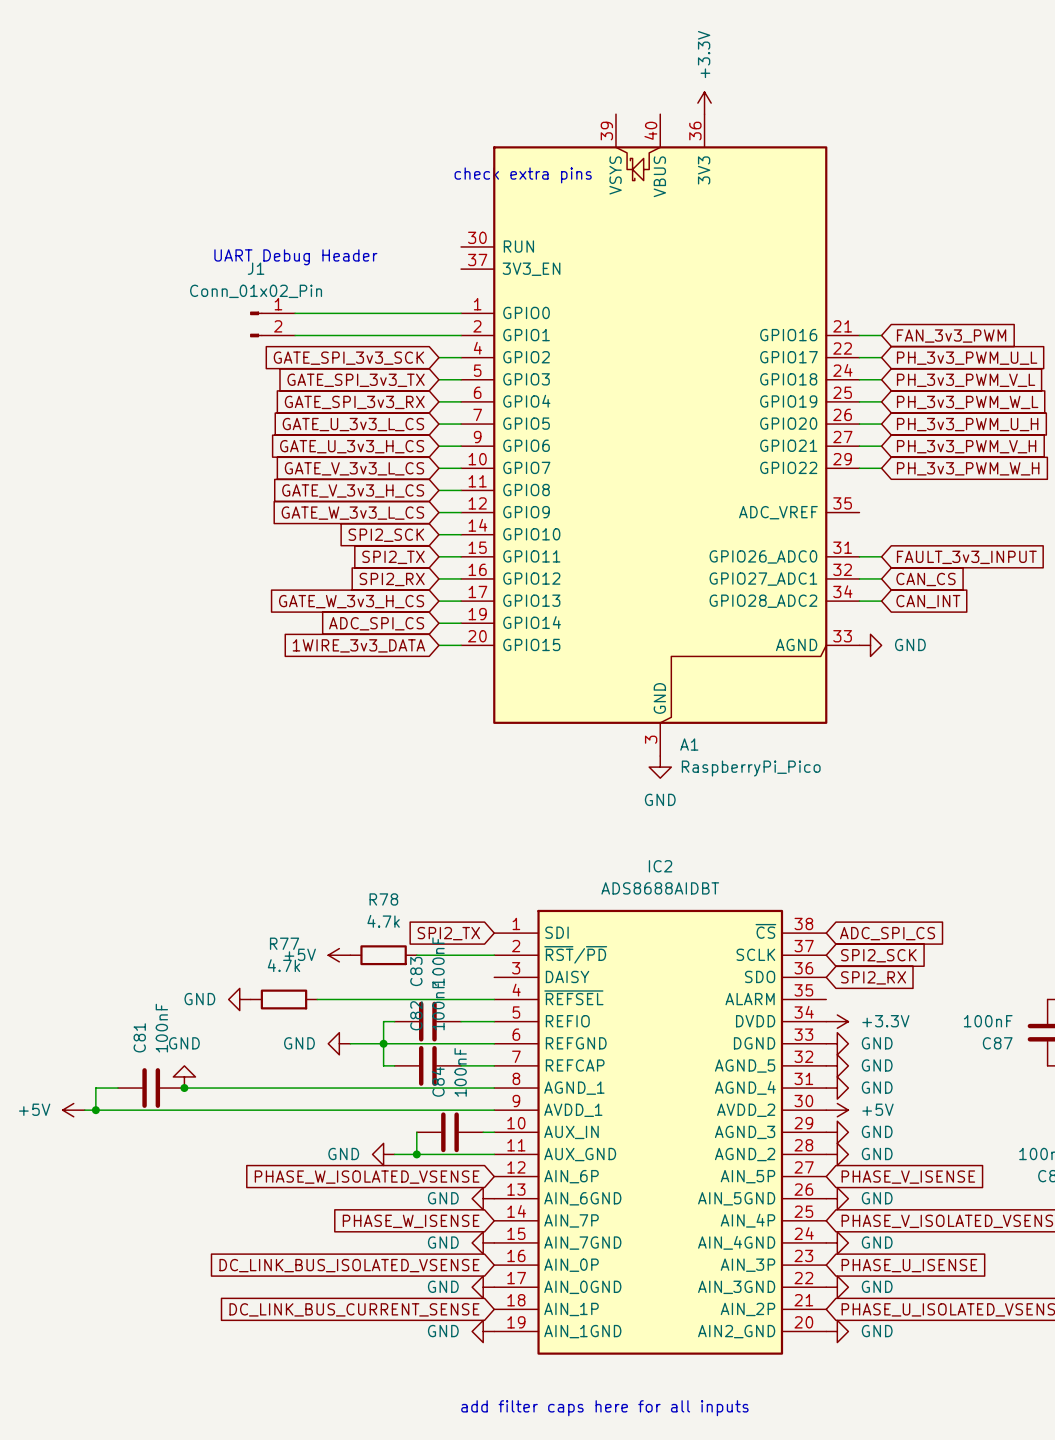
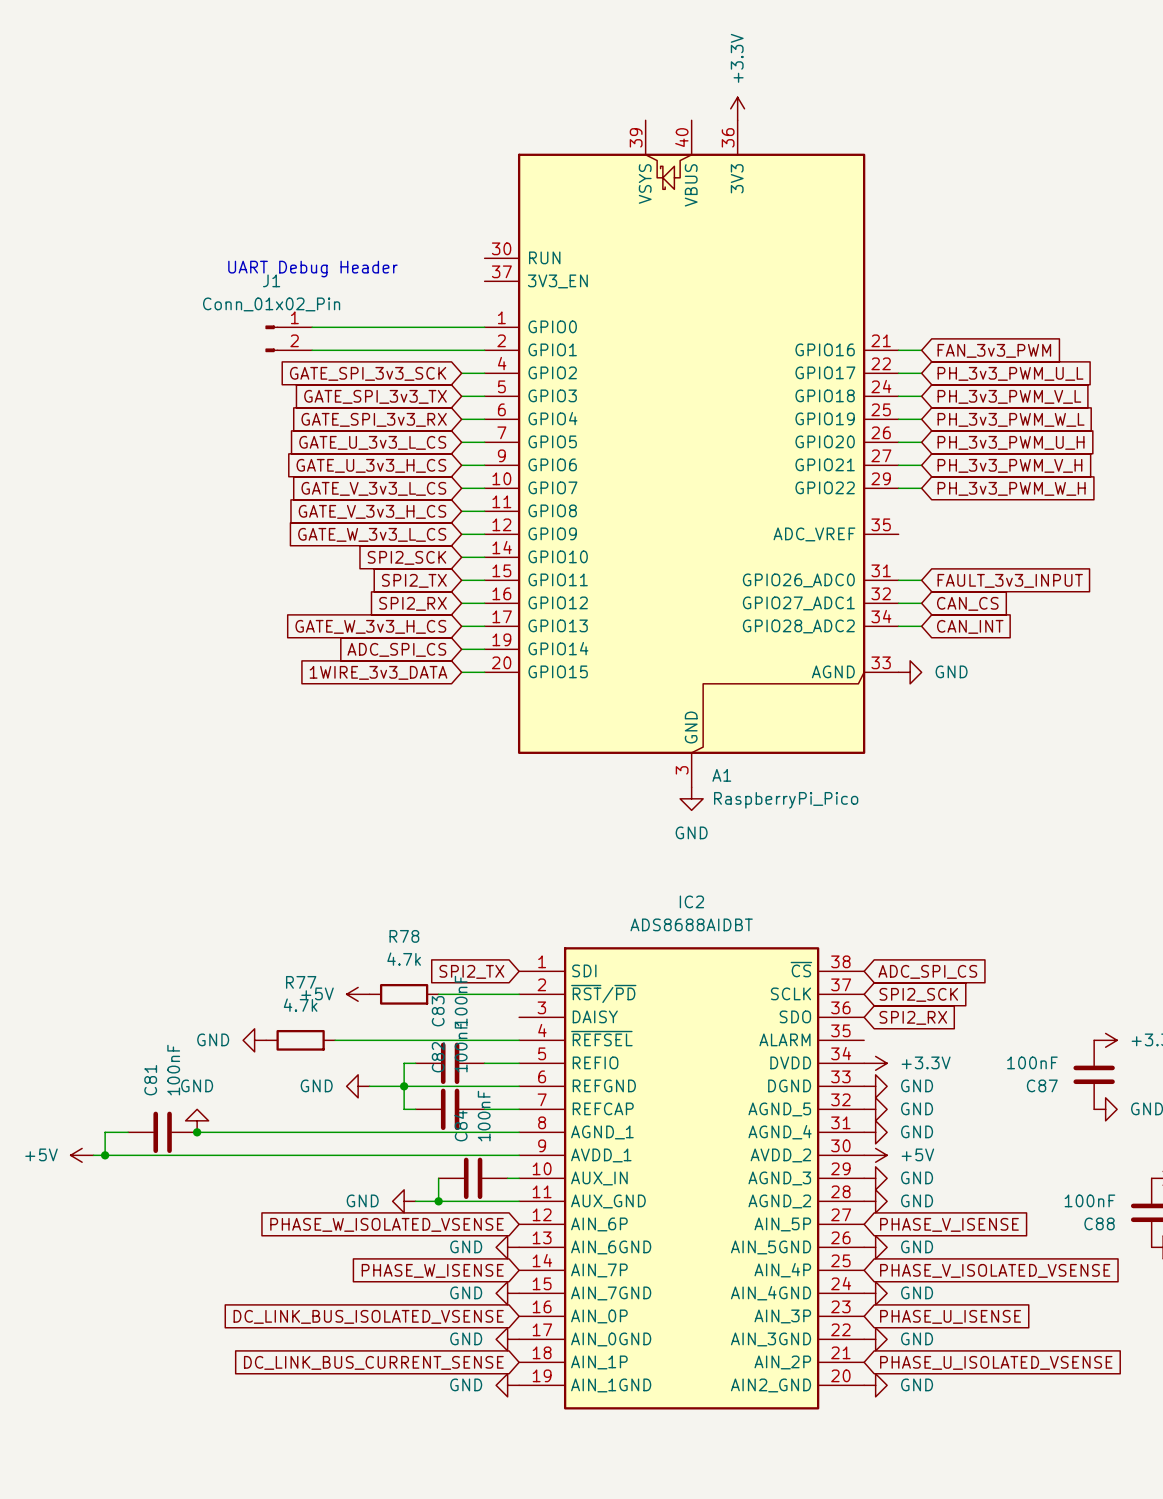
text: check extra pins (523, 175) -> none
text: add filter caps here for all inputs (604, 1408) -> none

